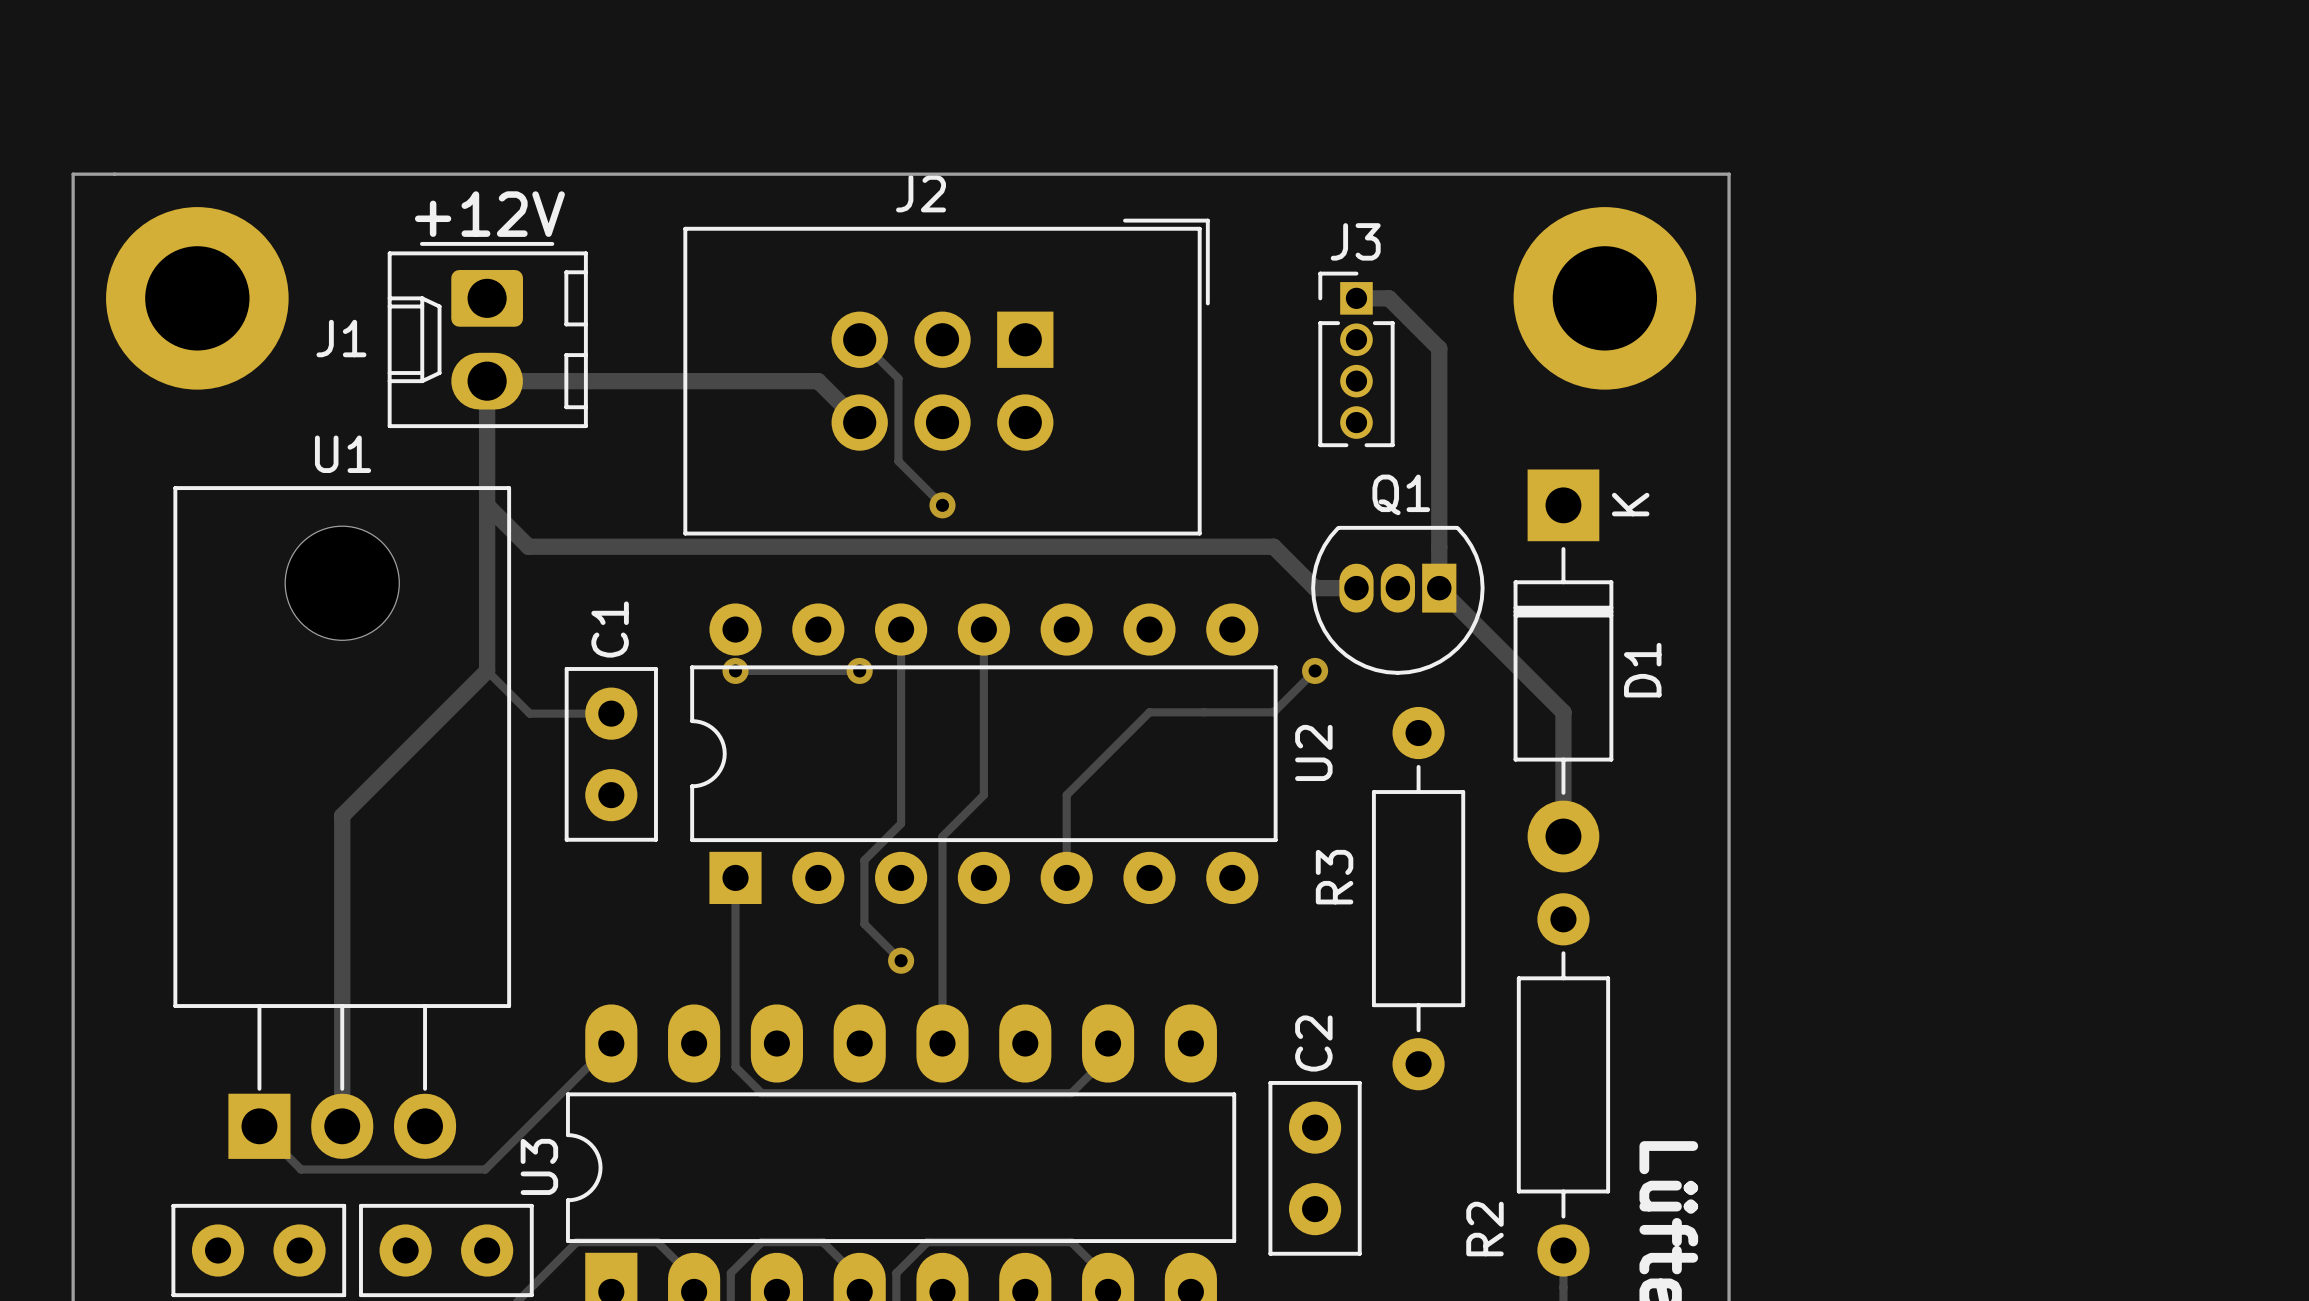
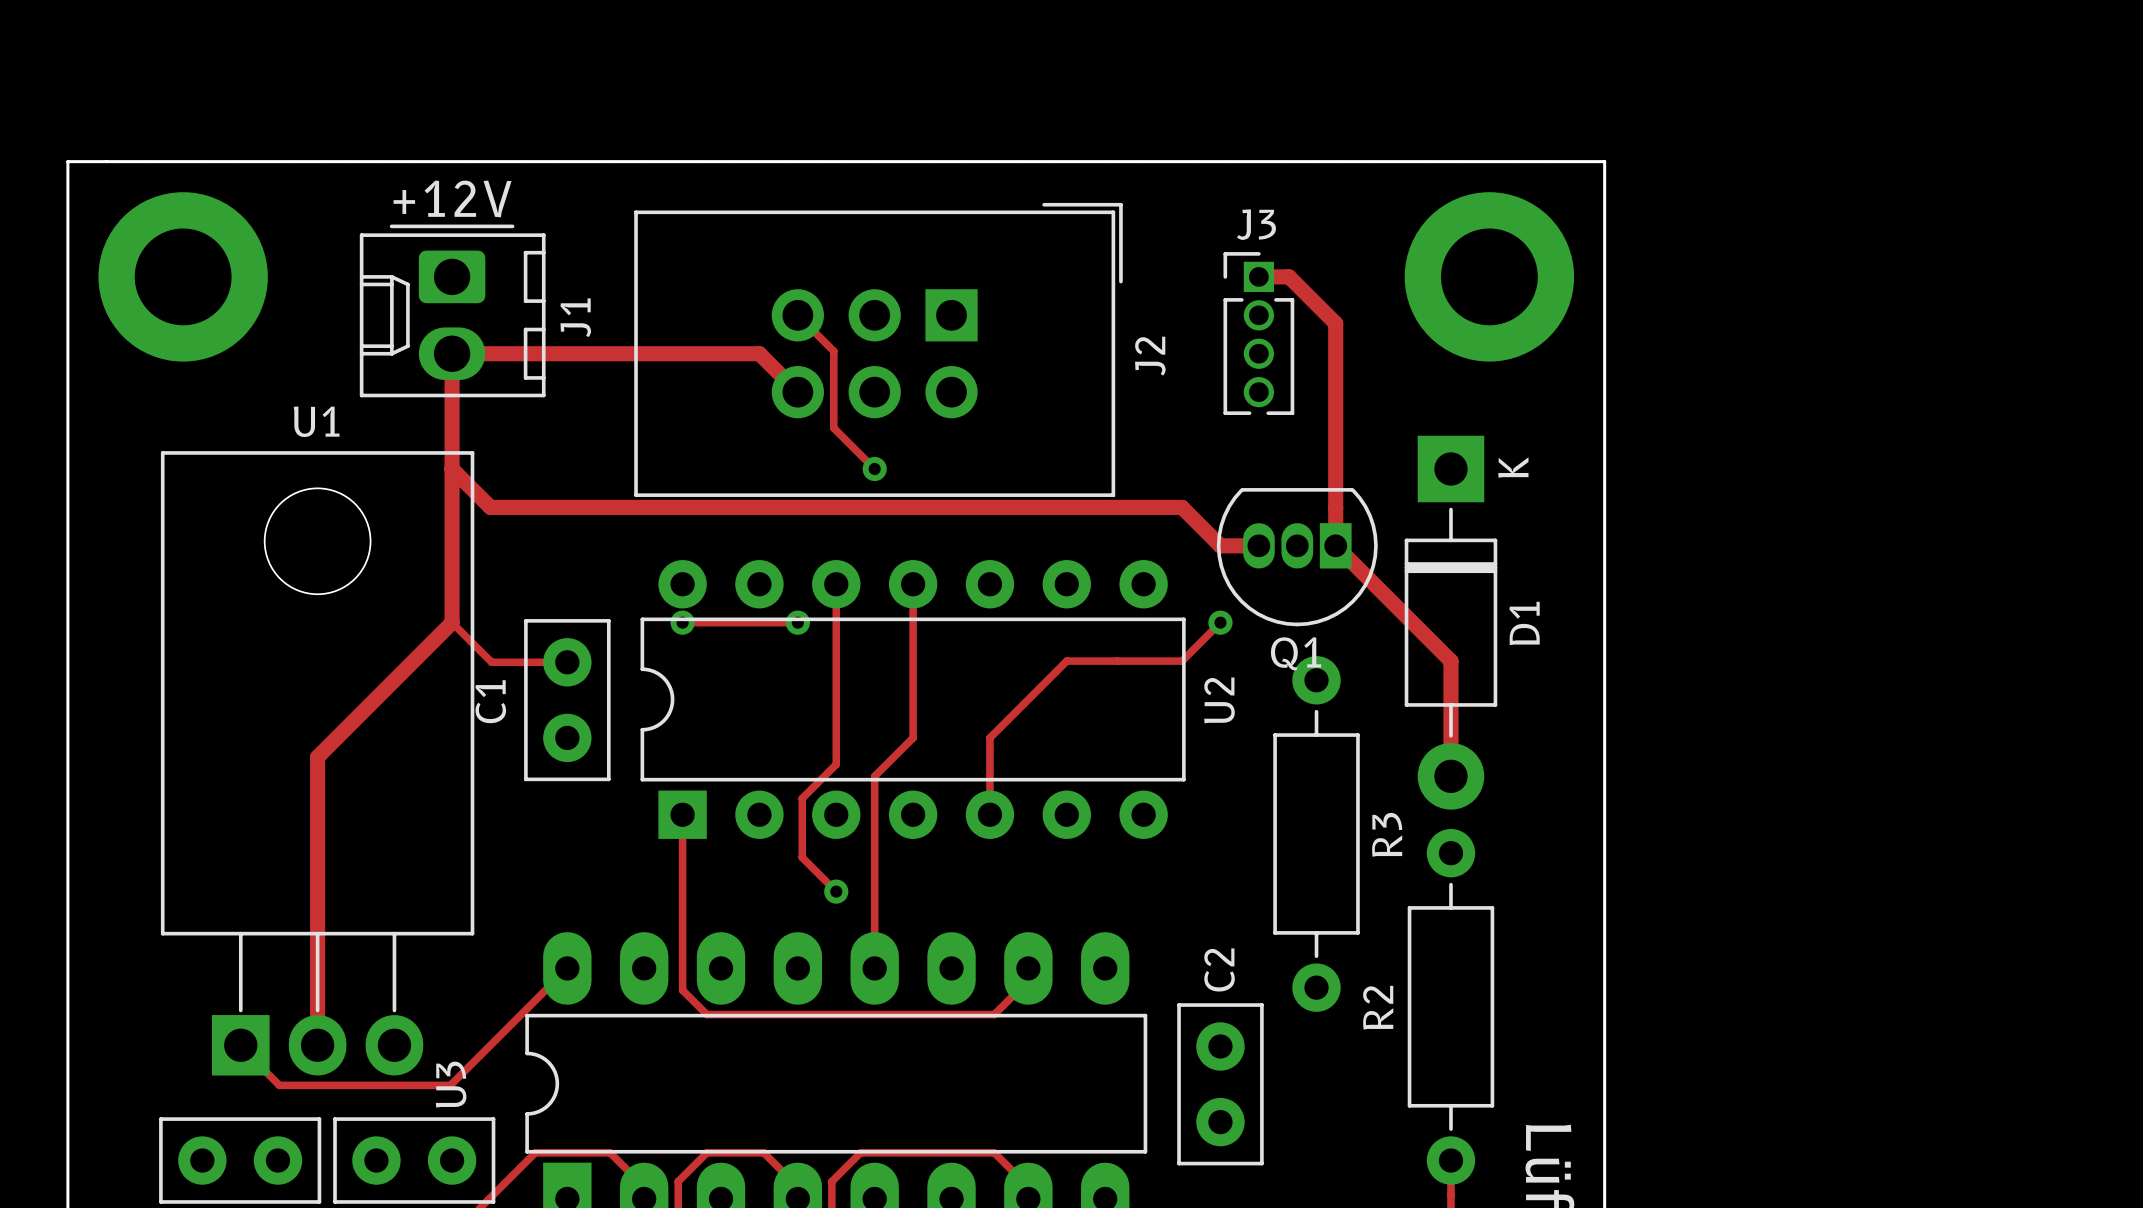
J2 name rotation: 0° (921, 193) -> 90° counterclockwise (1150, 356)
J2 name position: J2 (921, 193) -> J2 (1150, 356)
J1 name rotation: 0° (341, 338) -> 90° counterclockwise (575, 317)
J1 name position: J1 (341, 338) -> J1 (575, 317)
Q1 name position: Q1 (1401, 494) -> Q1 (1296, 653)
C1 name position: C1 (610, 629) -> C1 (490, 701)
R3 name position: R3 (1334, 877) -> R3 (1387, 834)
U3 name position: U3 (539, 1166) -> U3 (451, 1084)
R2 name position: R2 (1484, 1229) -> R2 (1378, 1007)

